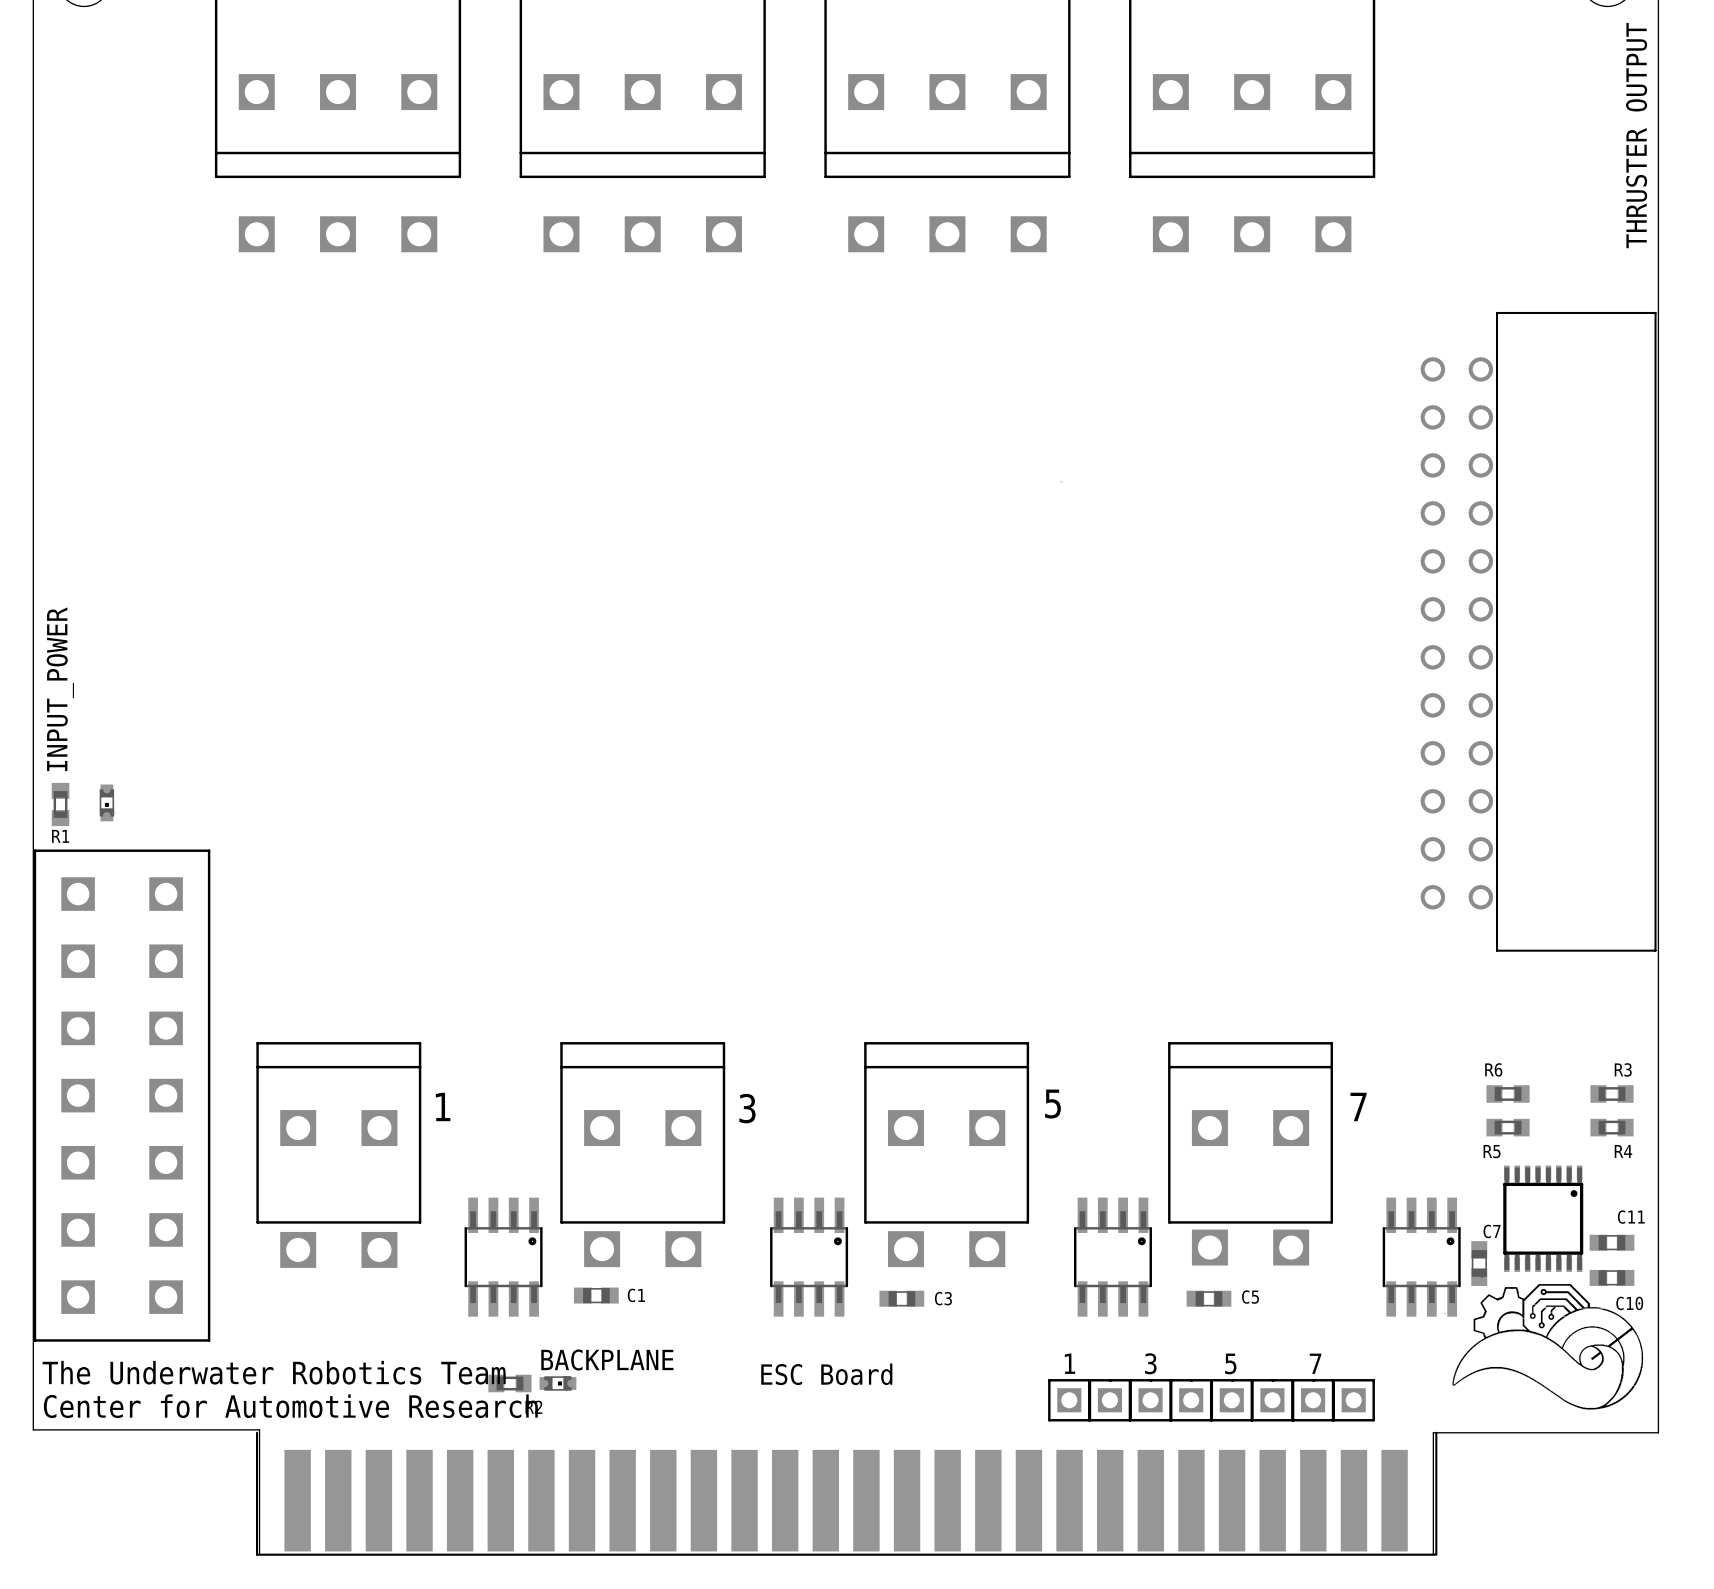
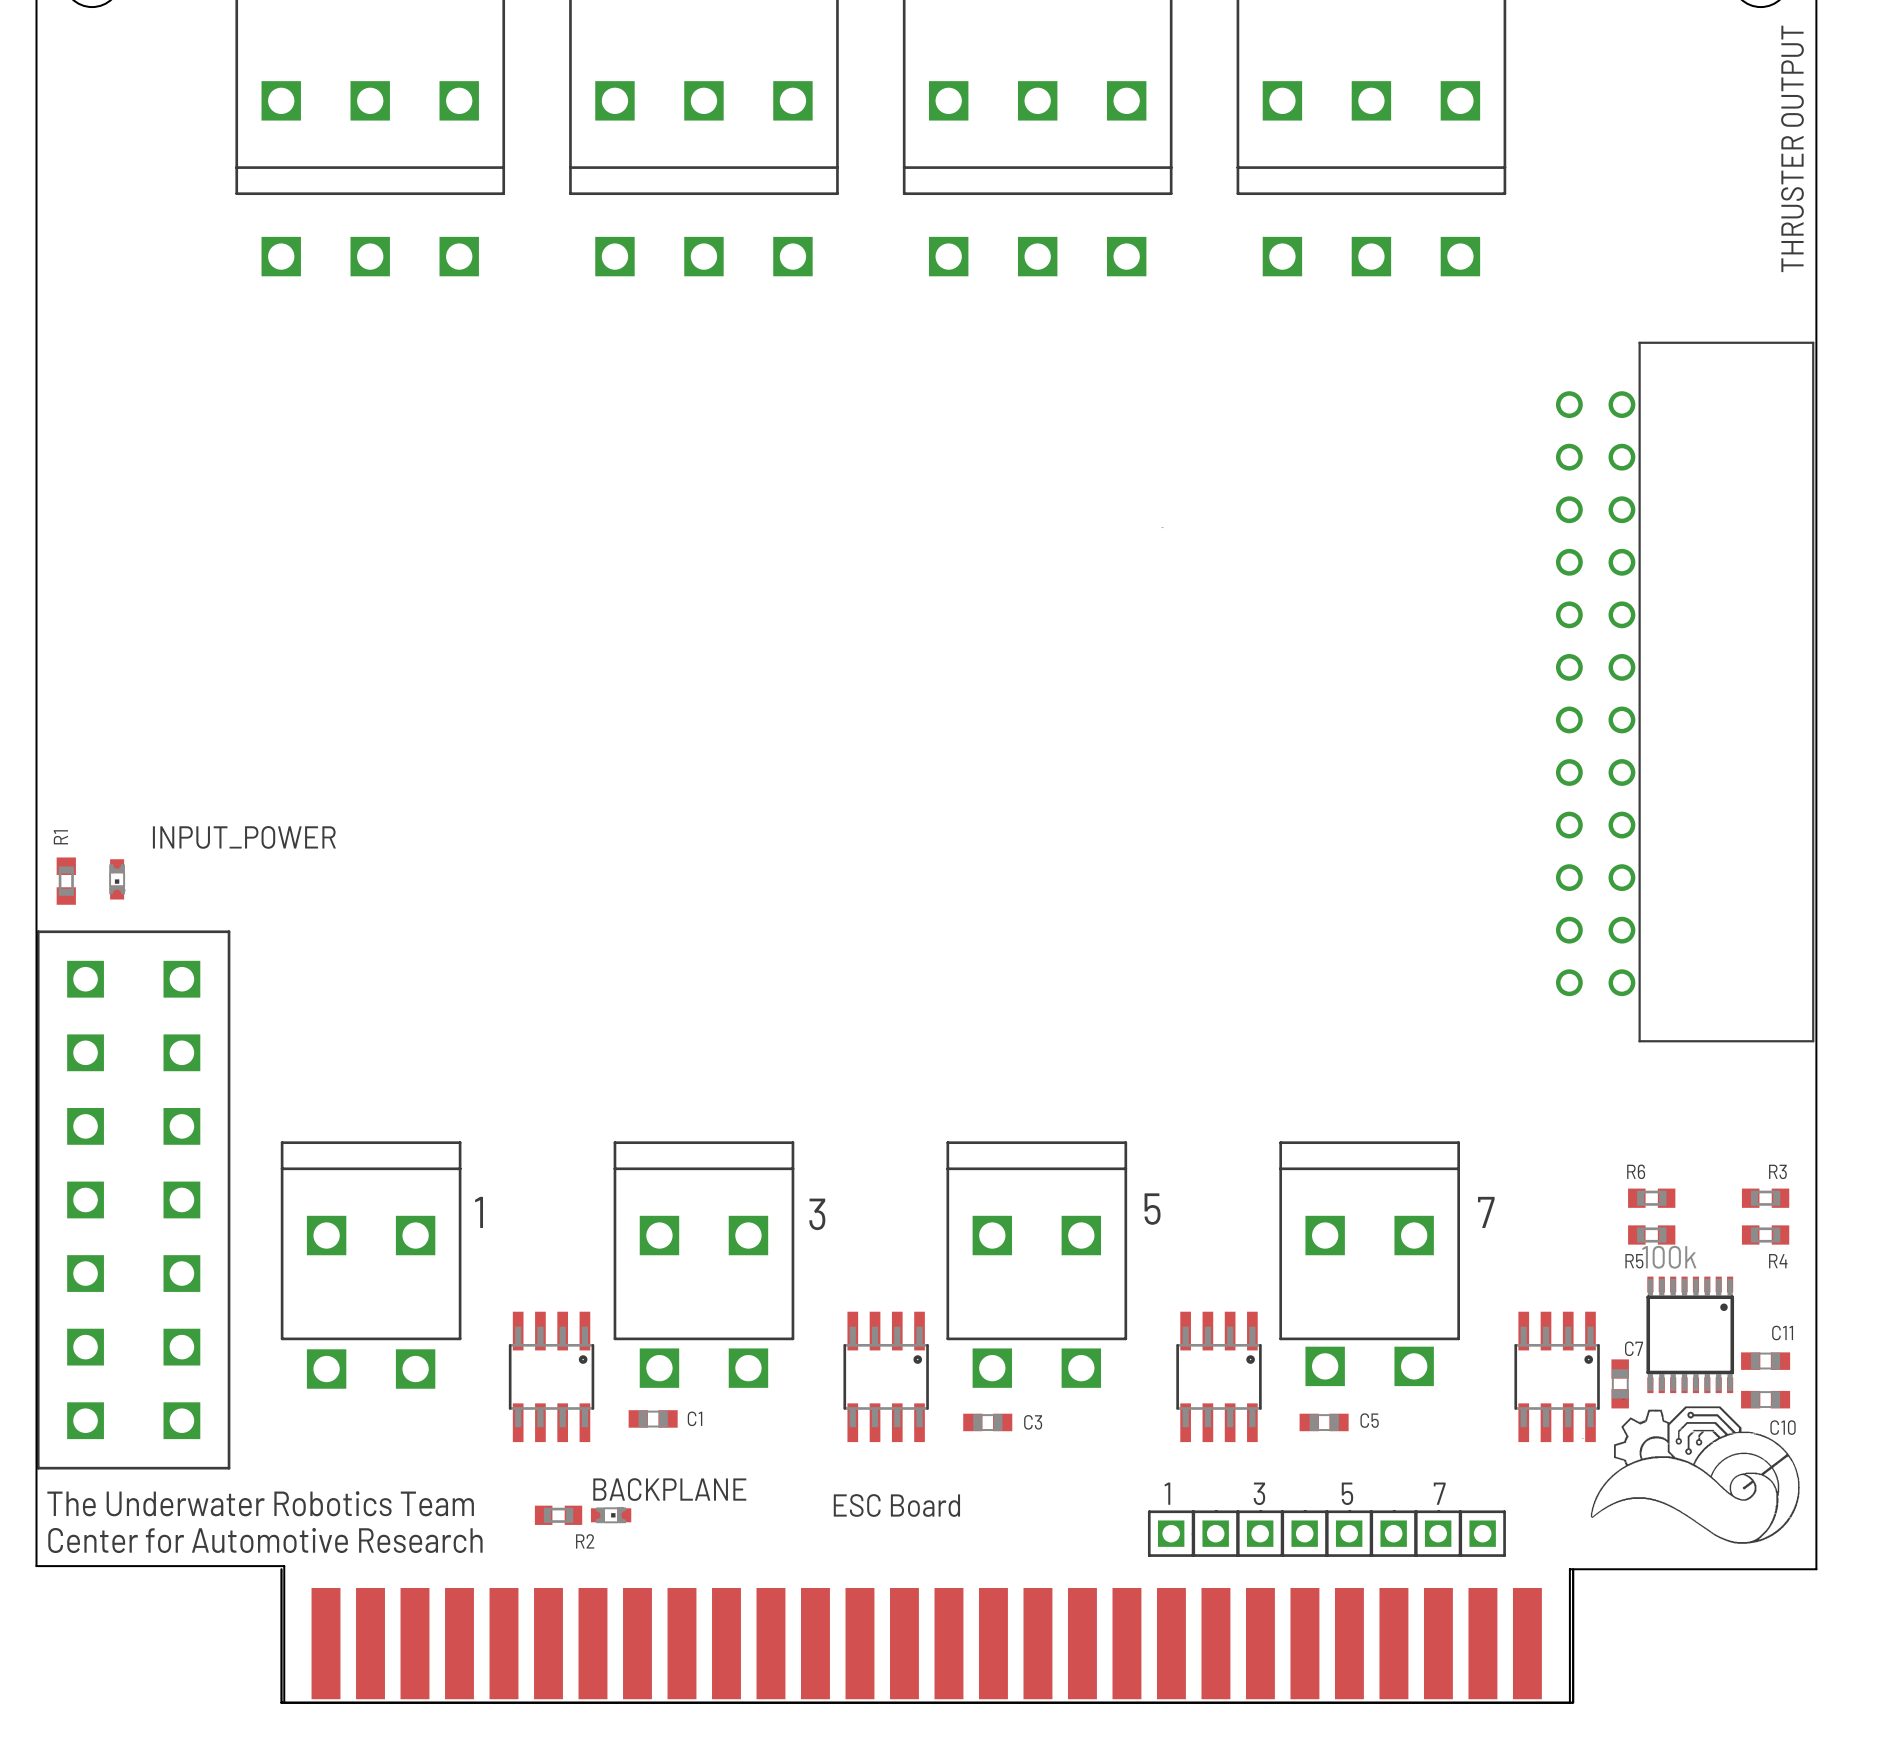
INPUT_POWER name rotation: 0° (60, 689) -> 90° clockwise (244, 837)
text rotation: 0° (60, 836) -> 90° counterclockwise (60, 837)
text position: R1 (60, 836) -> R1 (60, 837)
part value: none -> 100k (1669, 1257)

